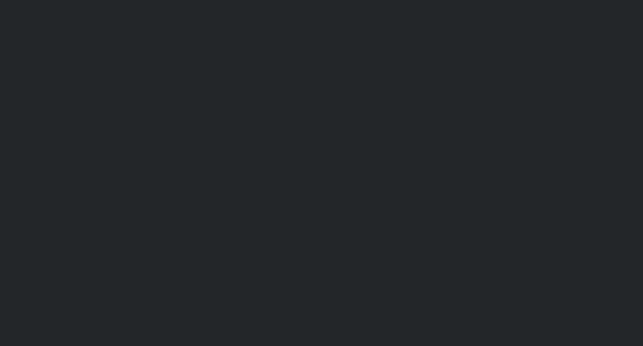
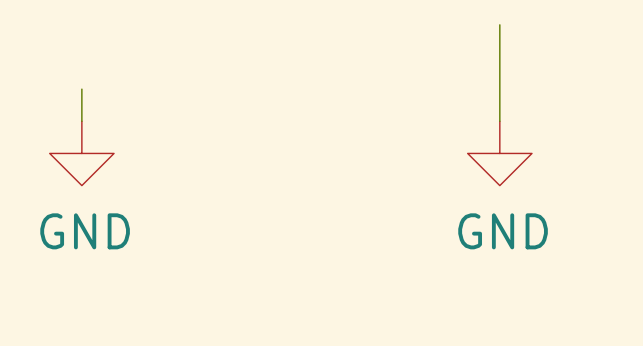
wire: none -> (499, 24) (499, 121)
wire: none -> (81, 89) (81, 121)
power symbol: none -> GND (81, 153)
power symbol: none -> GND (499, 153)

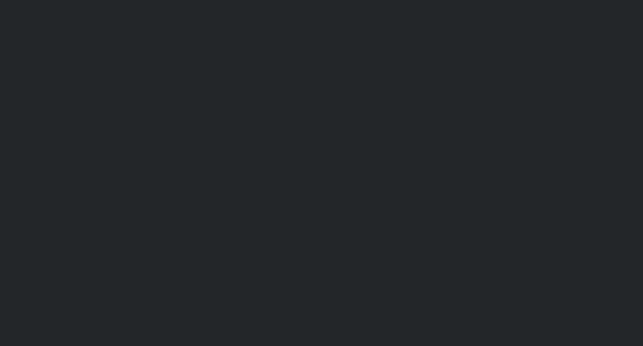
wire: (499, 24) (499, 121) -> none
wire: (81, 89) (81, 121) -> none
power symbol: GND (81, 153) -> none
power symbol: GND (499, 153) -> none

